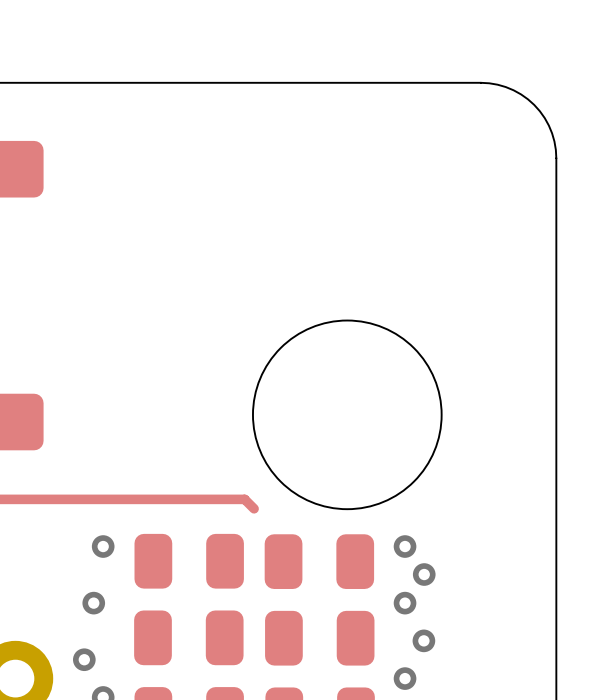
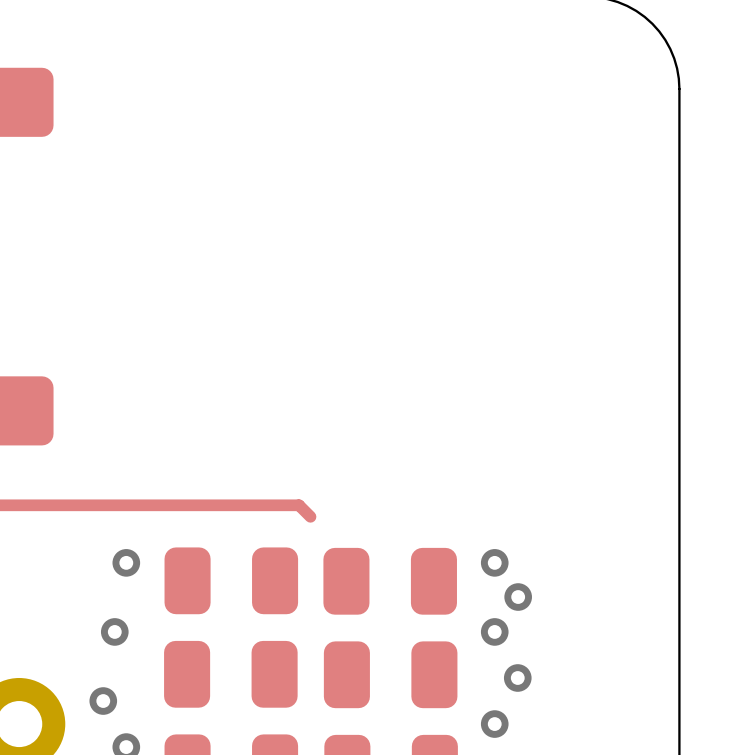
round board edge: [252, 319, 443, 511] -> none

